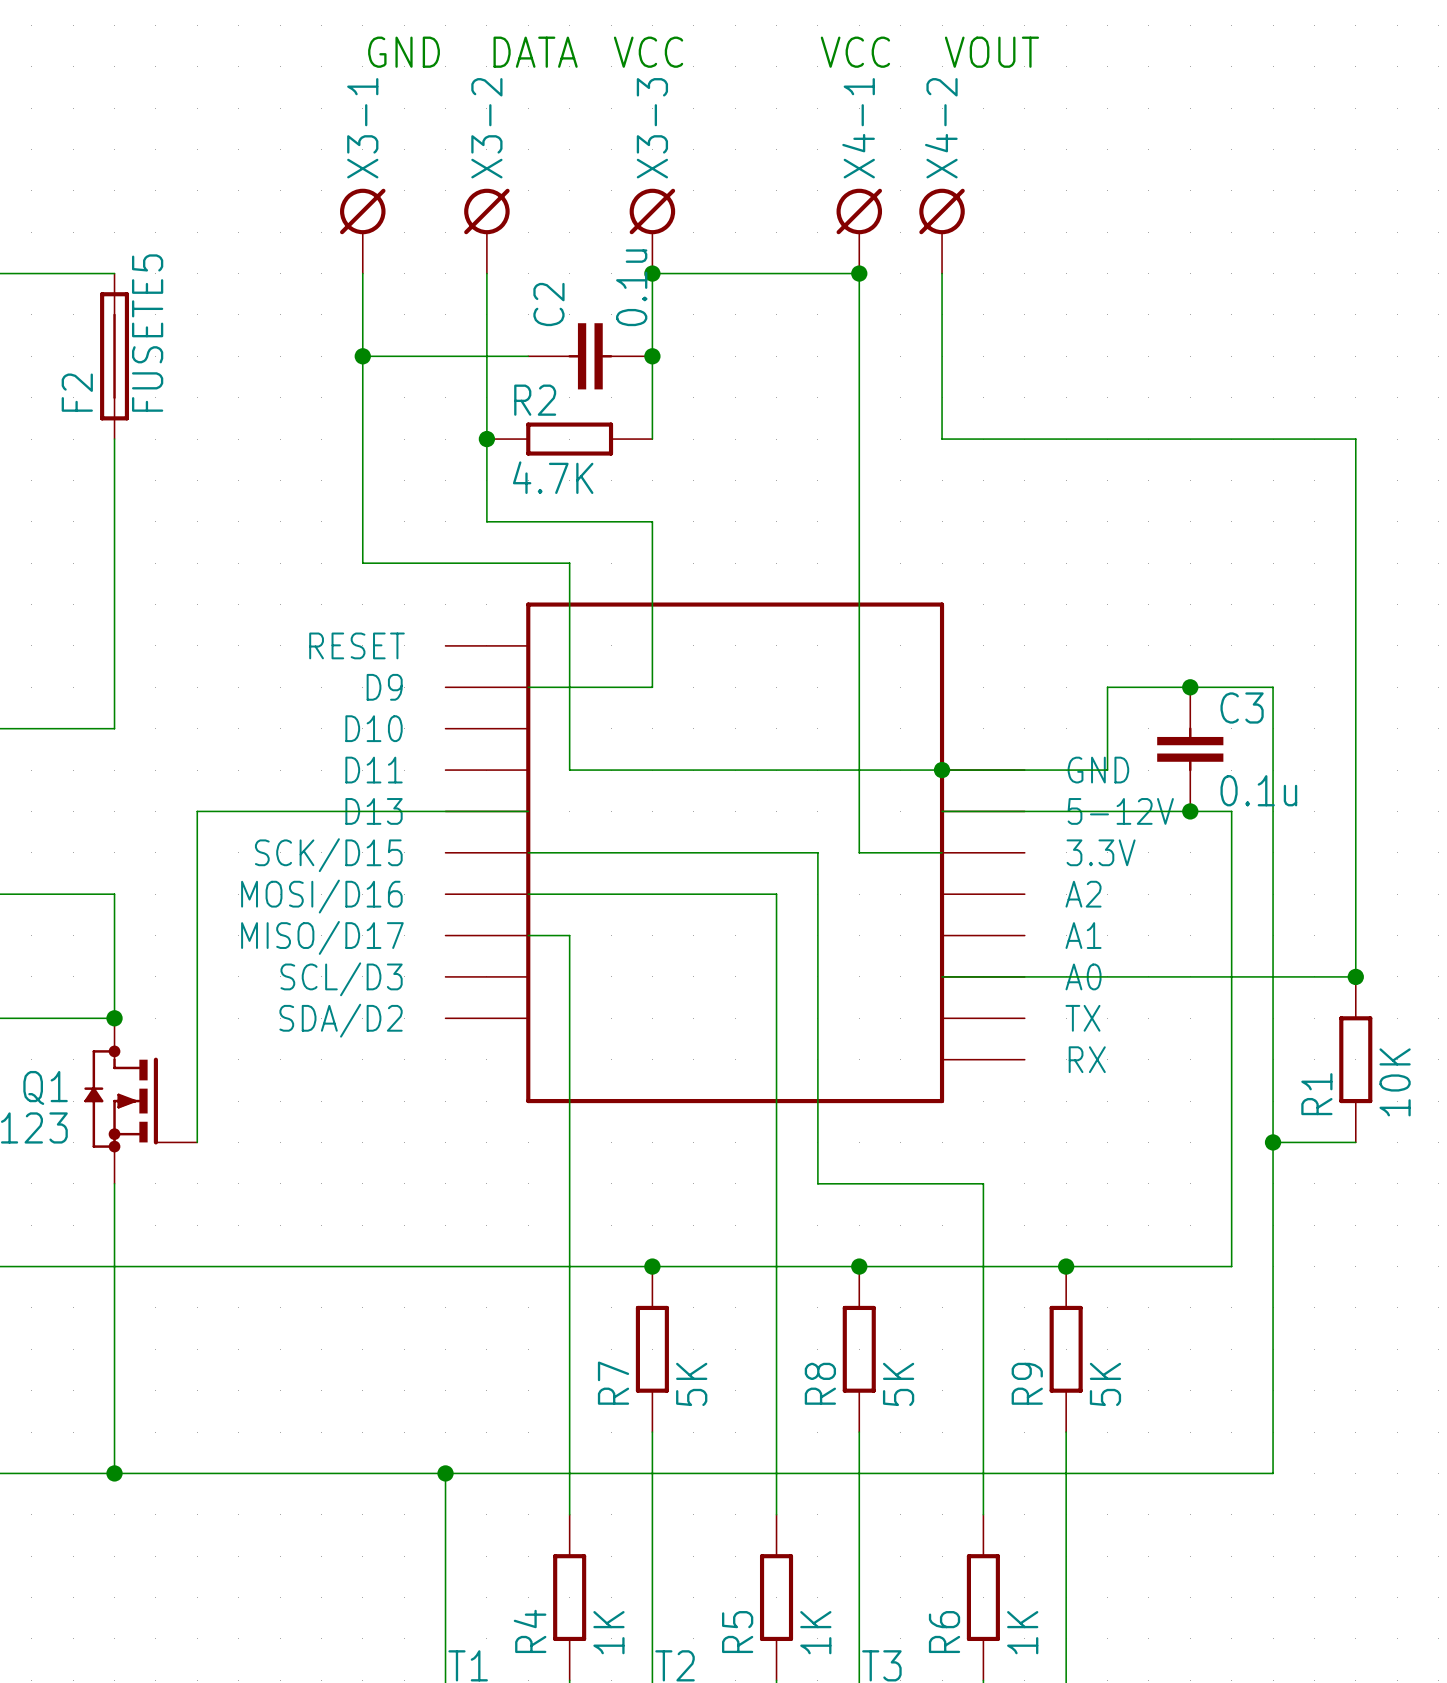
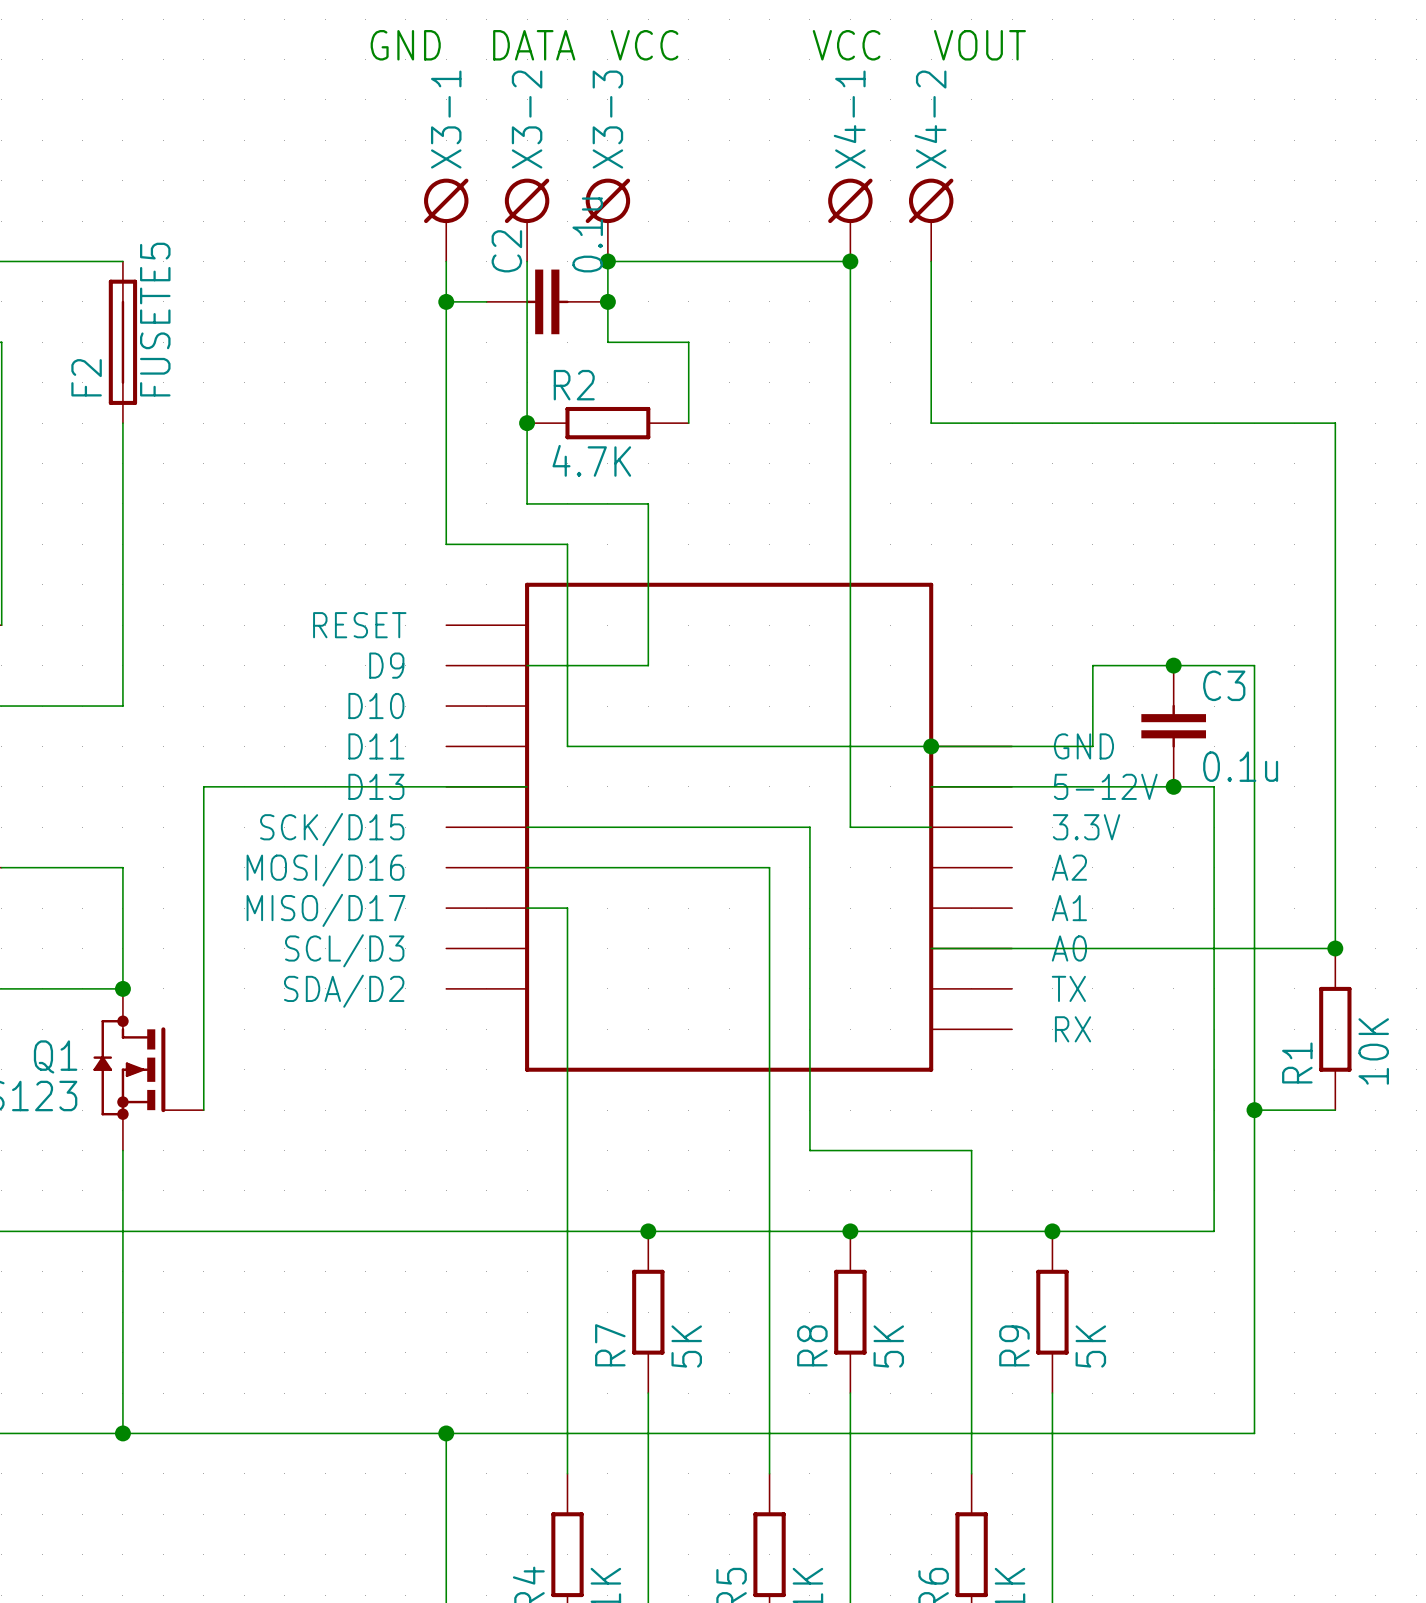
X3-1 position: (362, 231) -> (446, 220)
X3-2 position: (486, 231) -> (527, 220)
X3-3 position: (652, 231) -> (607, 220)
wire: (362, 273) (362, 563) (445, 563) -> (446, 261) (446, 544)
wire: (486, 273) (486, 521) (528, 521) -> (527, 261) (527, 503)
junction: none -> (607, 261)
wire: (652, 273) (652, 439) -> (648, 261) (607, 261) (607, 342) (688, 342) (688, 423)
junction: (652, 273) -> none
wire: none -> (446, 301) (486, 301)
junction: none -> (446, 301)
junction: none -> (607, 301)
wire: (362, 356) (528, 356) -> none
junction: (362, 356) -> none
C2 position: (590, 356) -> (547, 301)
junction: (652, 356) -> none
junction position: (486, 439) -> (527, 423)
R2 position: (569, 439) -> (607, 423)

